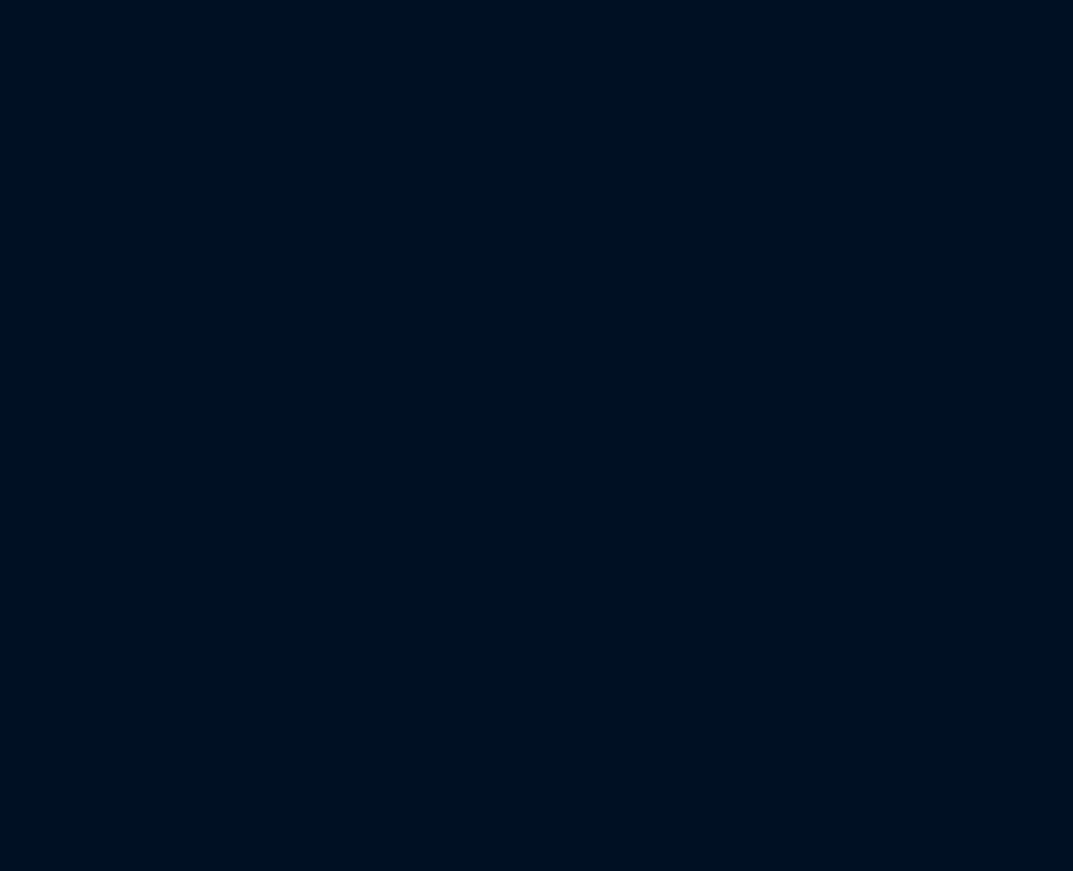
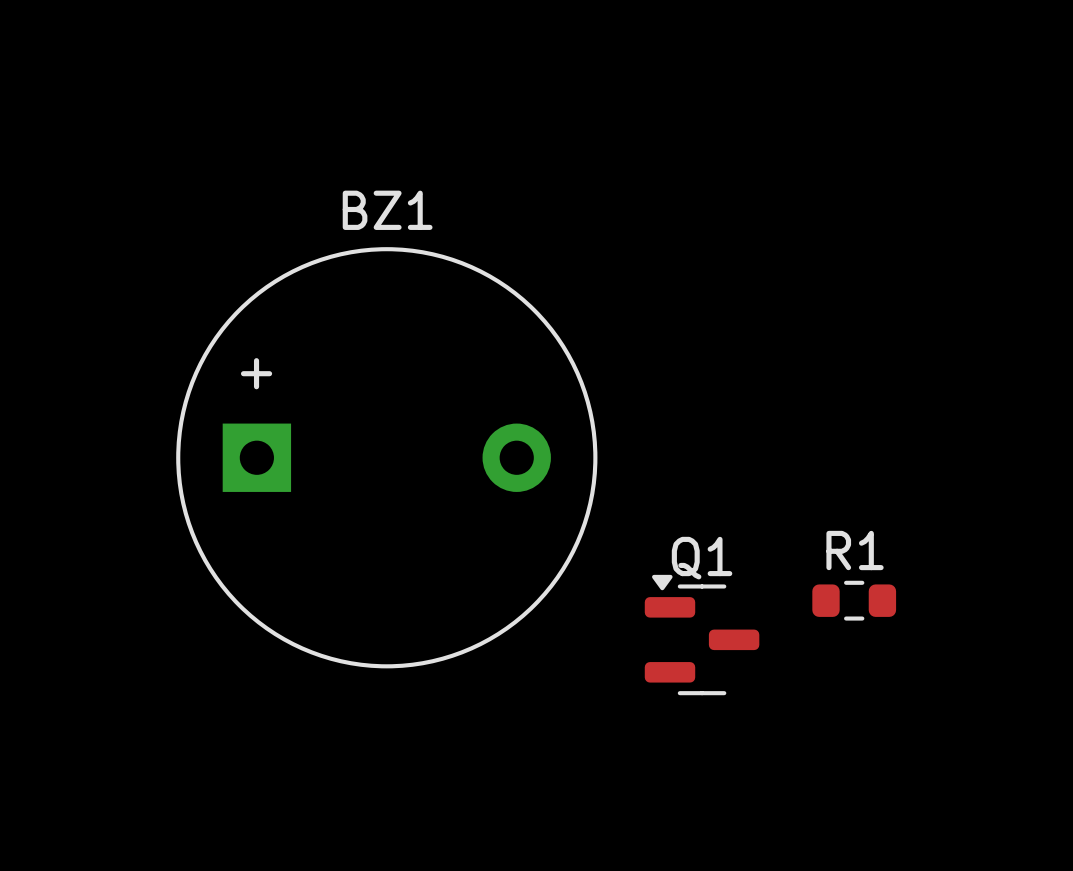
BZ1: none -> (386, 457)
R1: none -> (854, 600)
Q1: none -> (702, 635)

